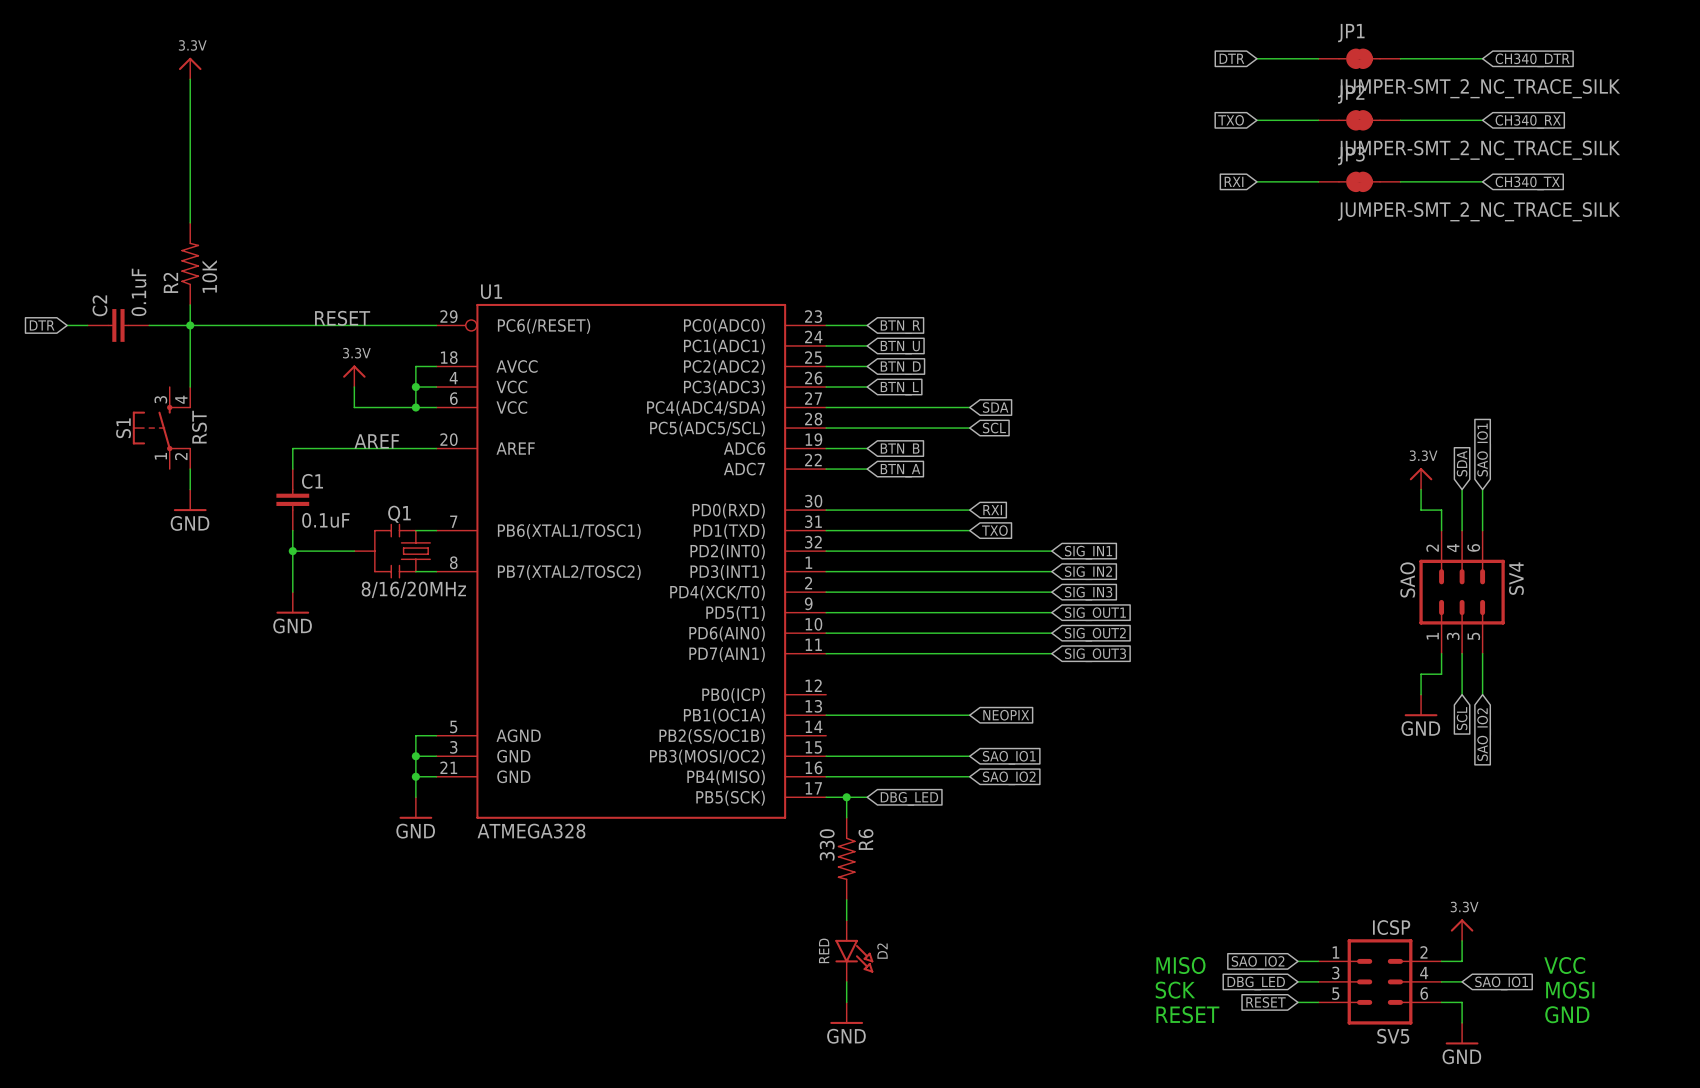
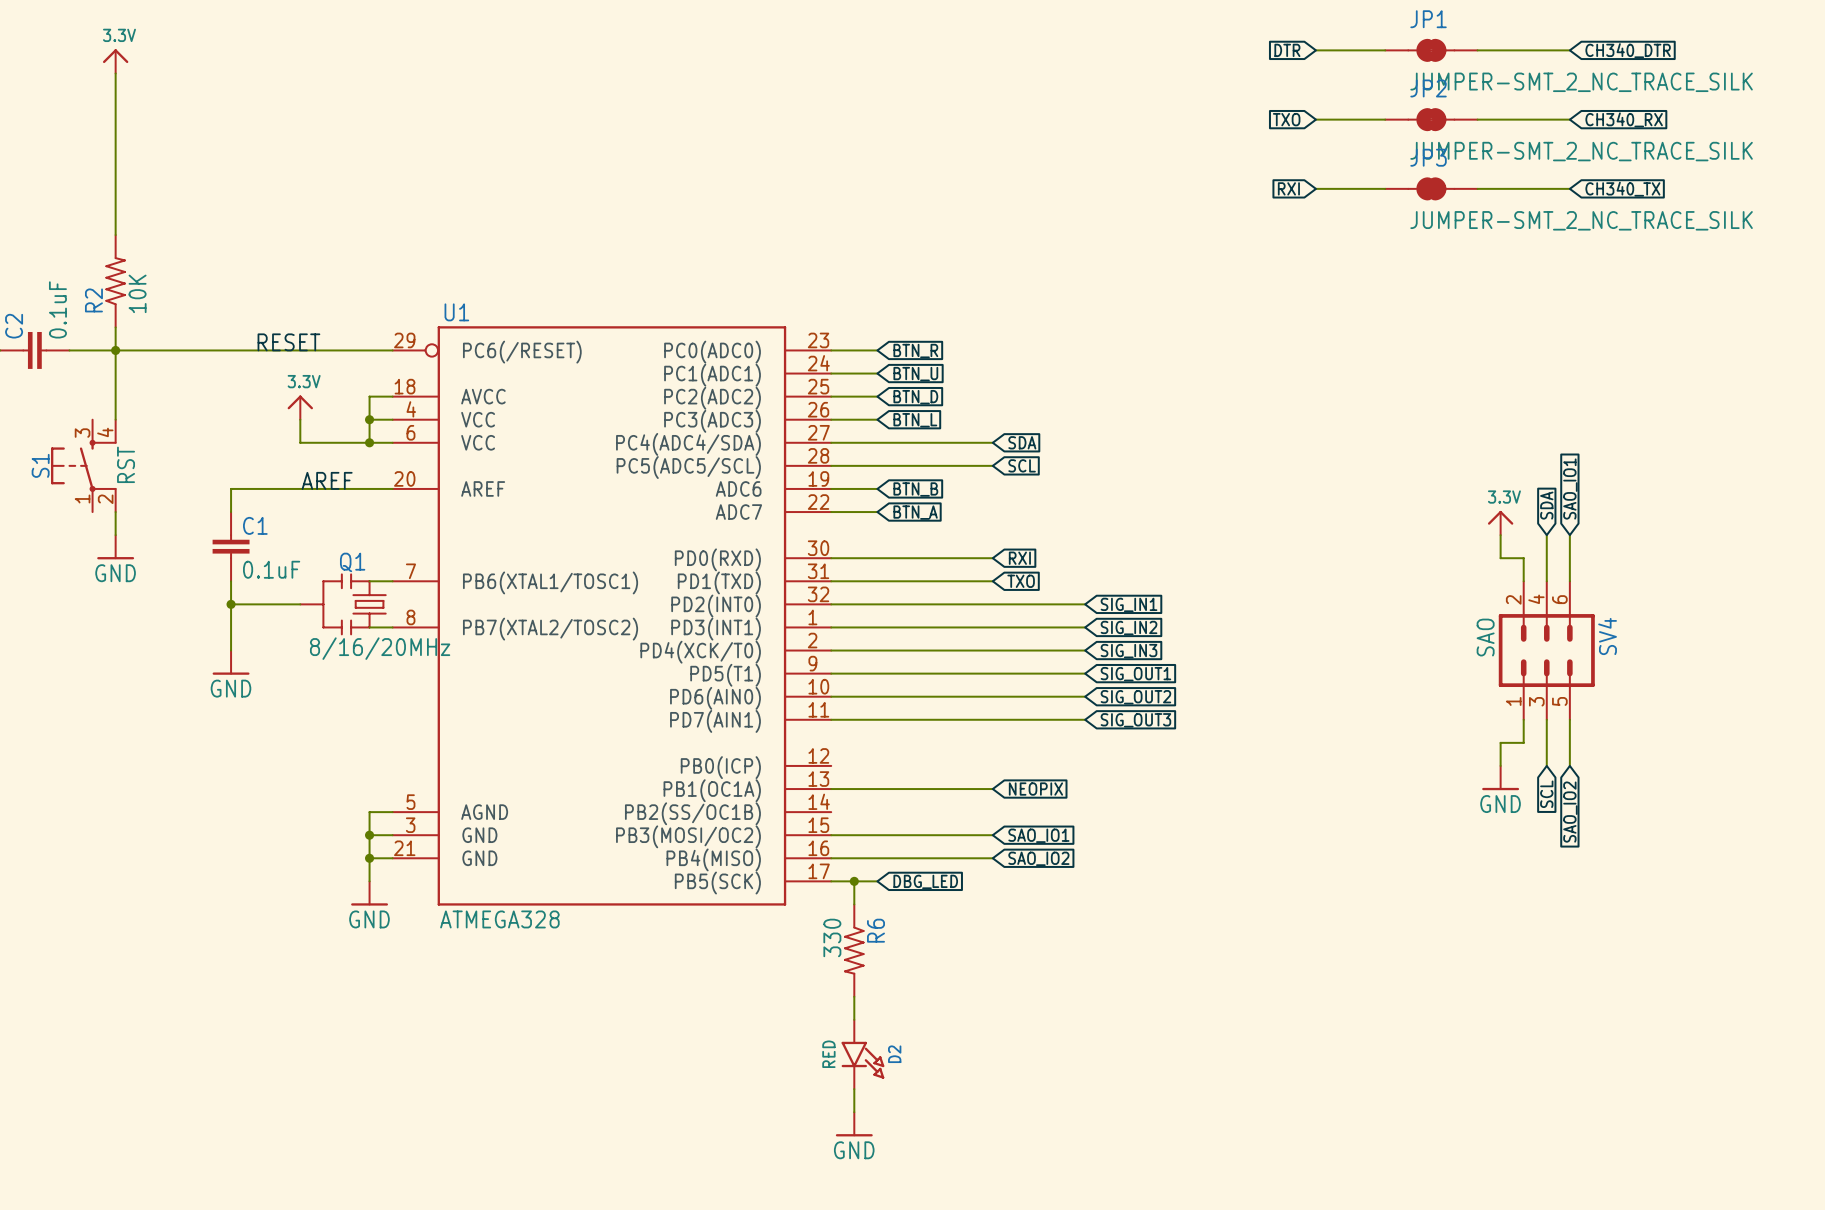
power symbol: 3.3V (1462, 930) -> none
wire: (1462, 940) (1462, 961) (1441, 961) -> none
wire: (1297, 961) (1318, 961) -> none
global label: SAO_IO2 (1258, 962) -> none
text: MISO (1180, 965) -> none
text: VCC (1564, 965) -> none
wire: (1297, 981) (1318, 981) -> none
SV5: ICSP (1380, 981) -> none
wire: (1441, 981) (1462, 981) -> none
global label: DBG_LED (1256, 983) -> none
global label: SAO_IO1 (1501, 983) -> none
text: SCK (1175, 990) -> none
text: MOSI (1570, 990) -> none
global label: RESET (1266, 1002) -> none
wire: (1297, 1002) (1318, 1002) -> none
wire: (1441, 1002) (1462, 1002) (1462, 1022) -> none
text: RESET (1187, 1014) -> none
text: GND (1567, 1014) -> none
power symbol: GND (1462, 1033) -> none

